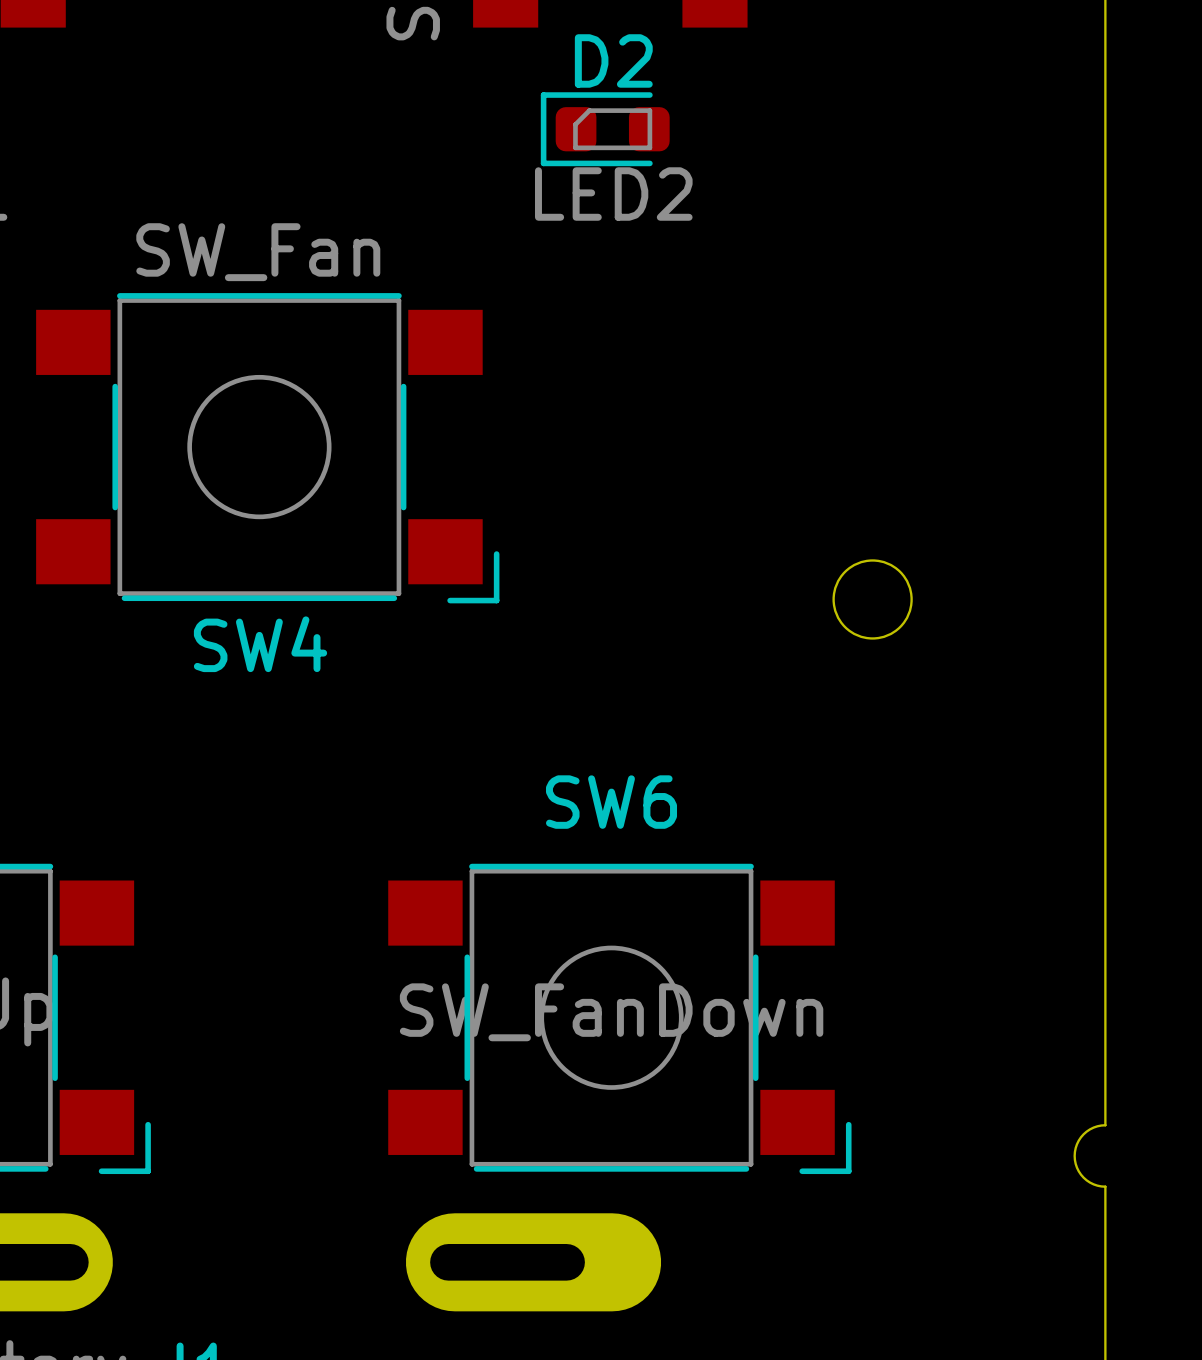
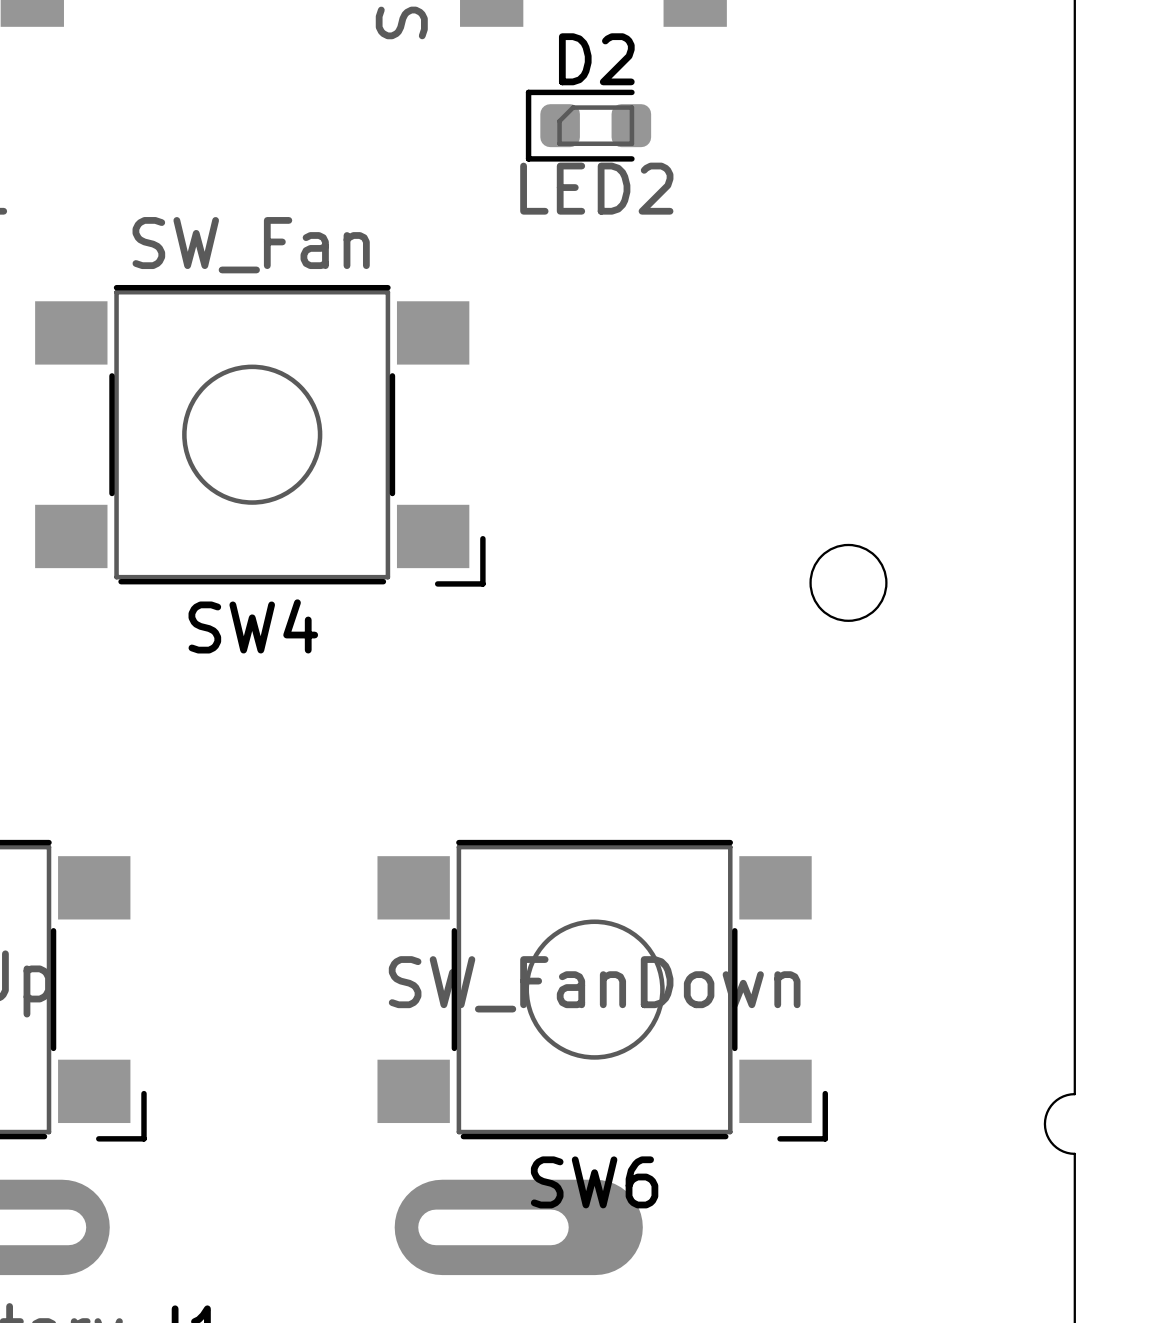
SW6 name position: SW6 (611, 802) -> SW6 (594, 1182)

